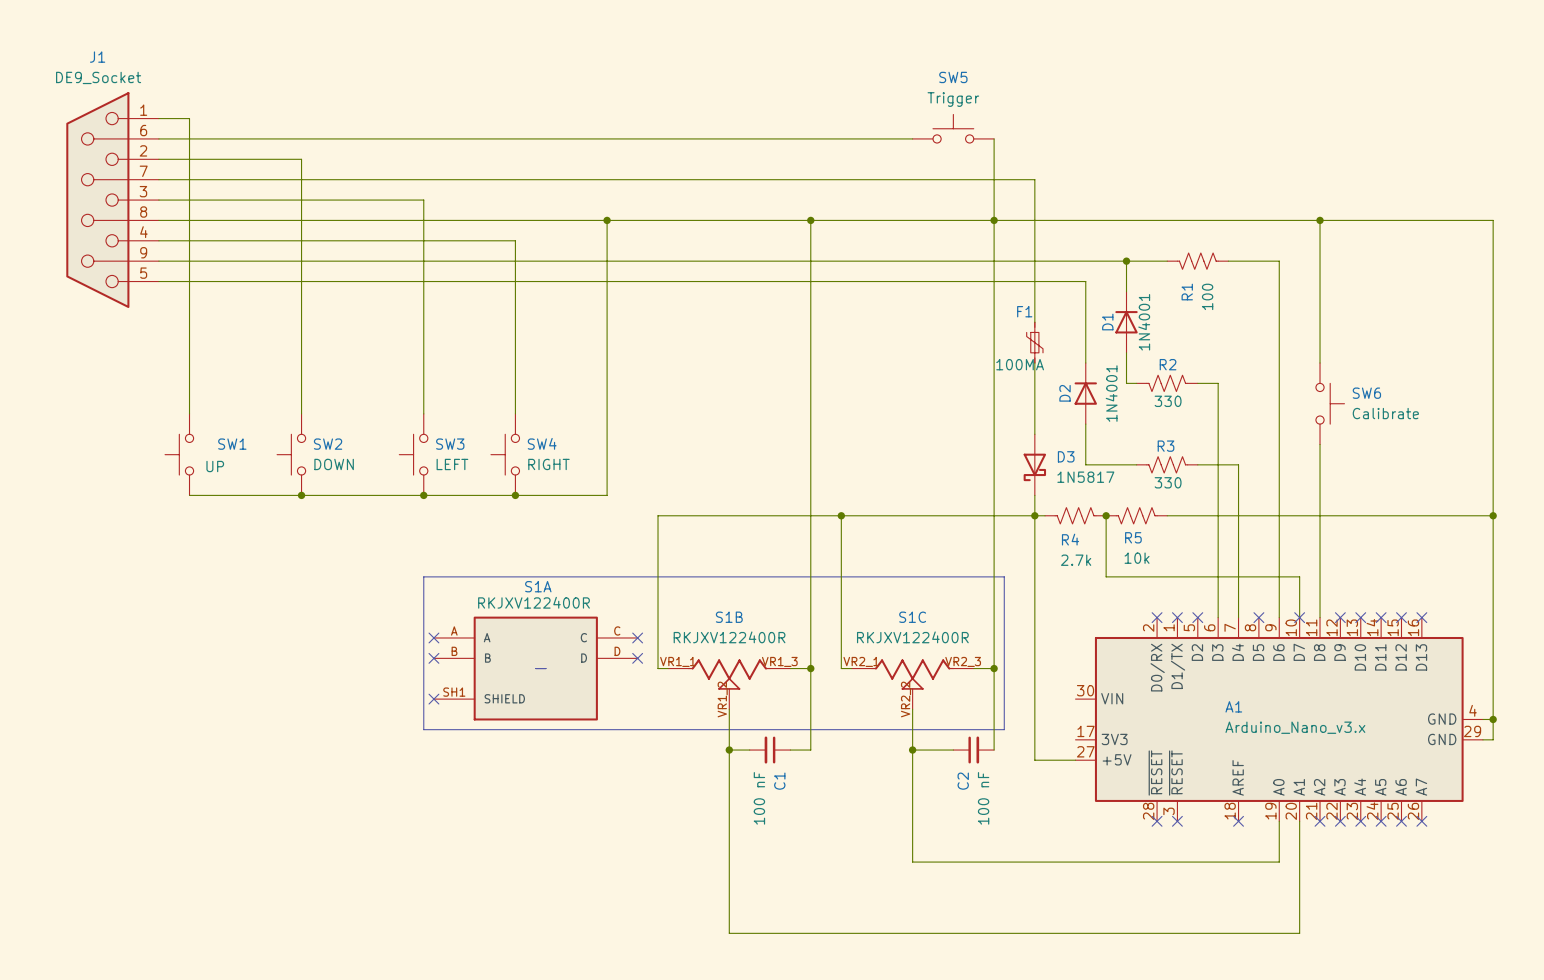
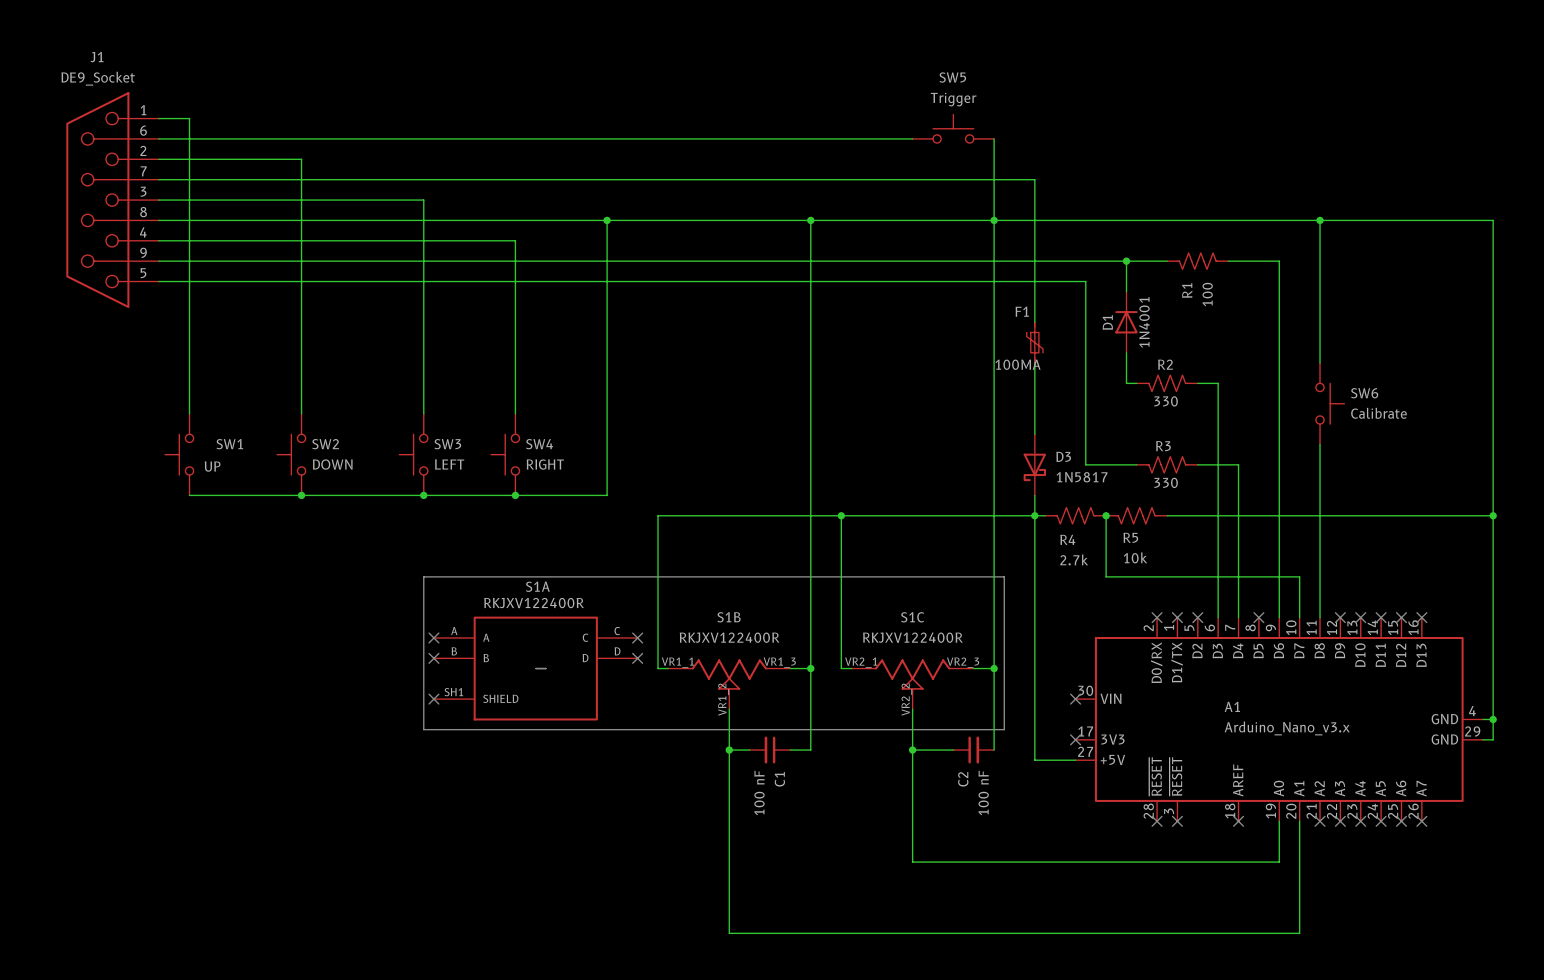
D2: 1N4001 (1085, 393) -> none
no-connect mark: (1299, 617) -> none
no-connect mark: none -> (1075, 699)
no-connect mark: none -> (1075, 739)

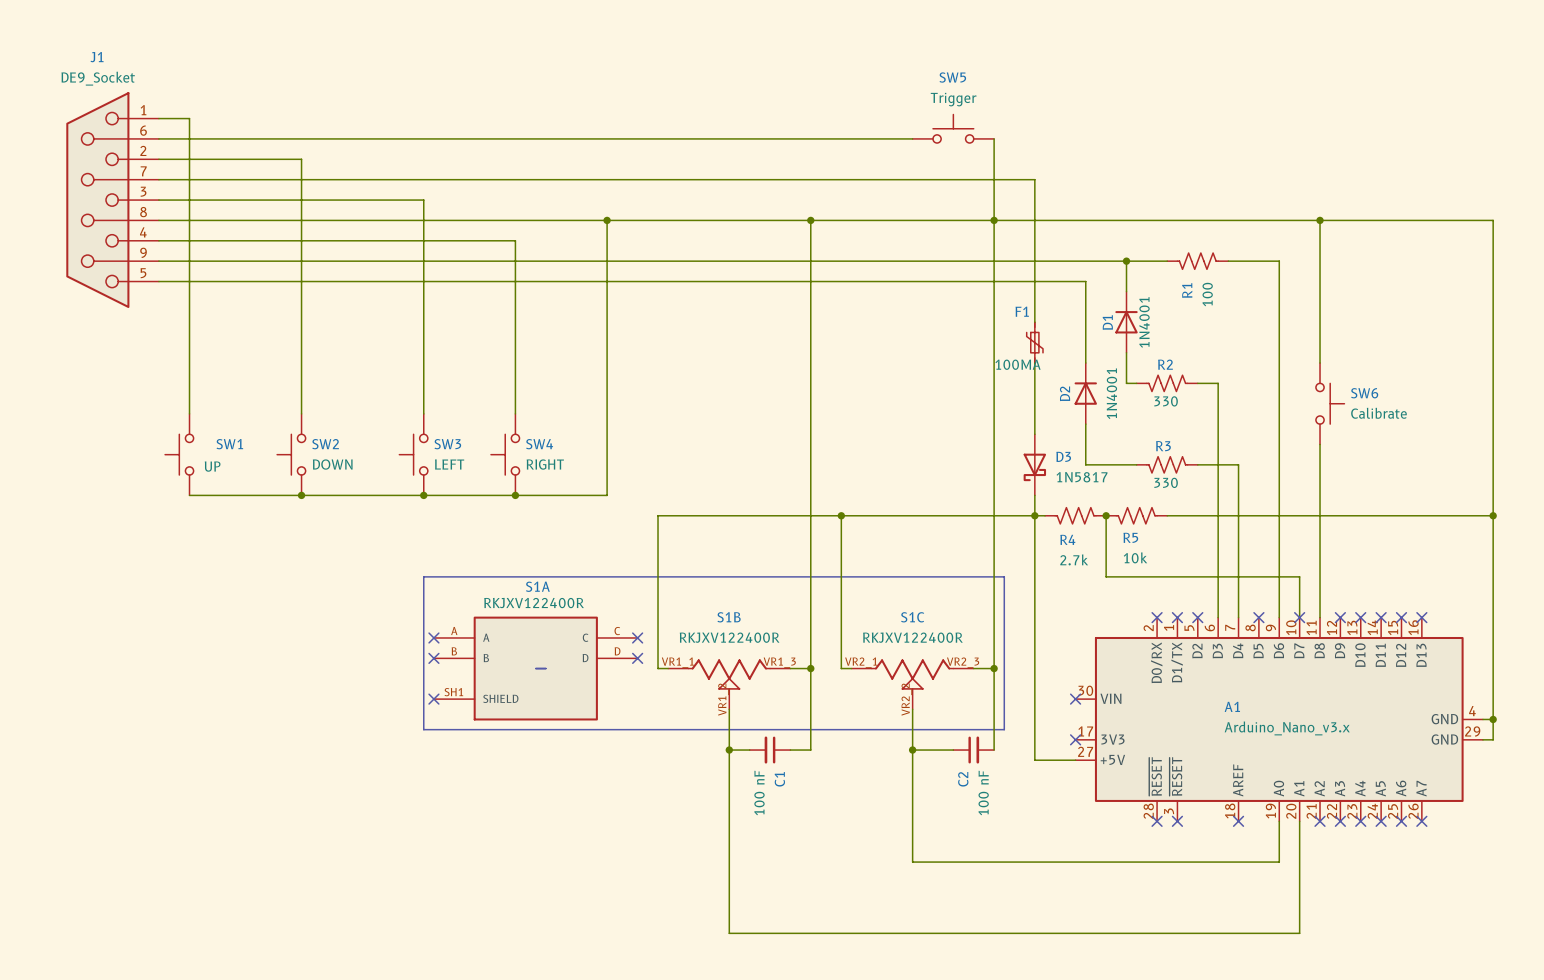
D2: none -> 1N4001 (1085, 393)
no-connect mark: none -> (1299, 617)

